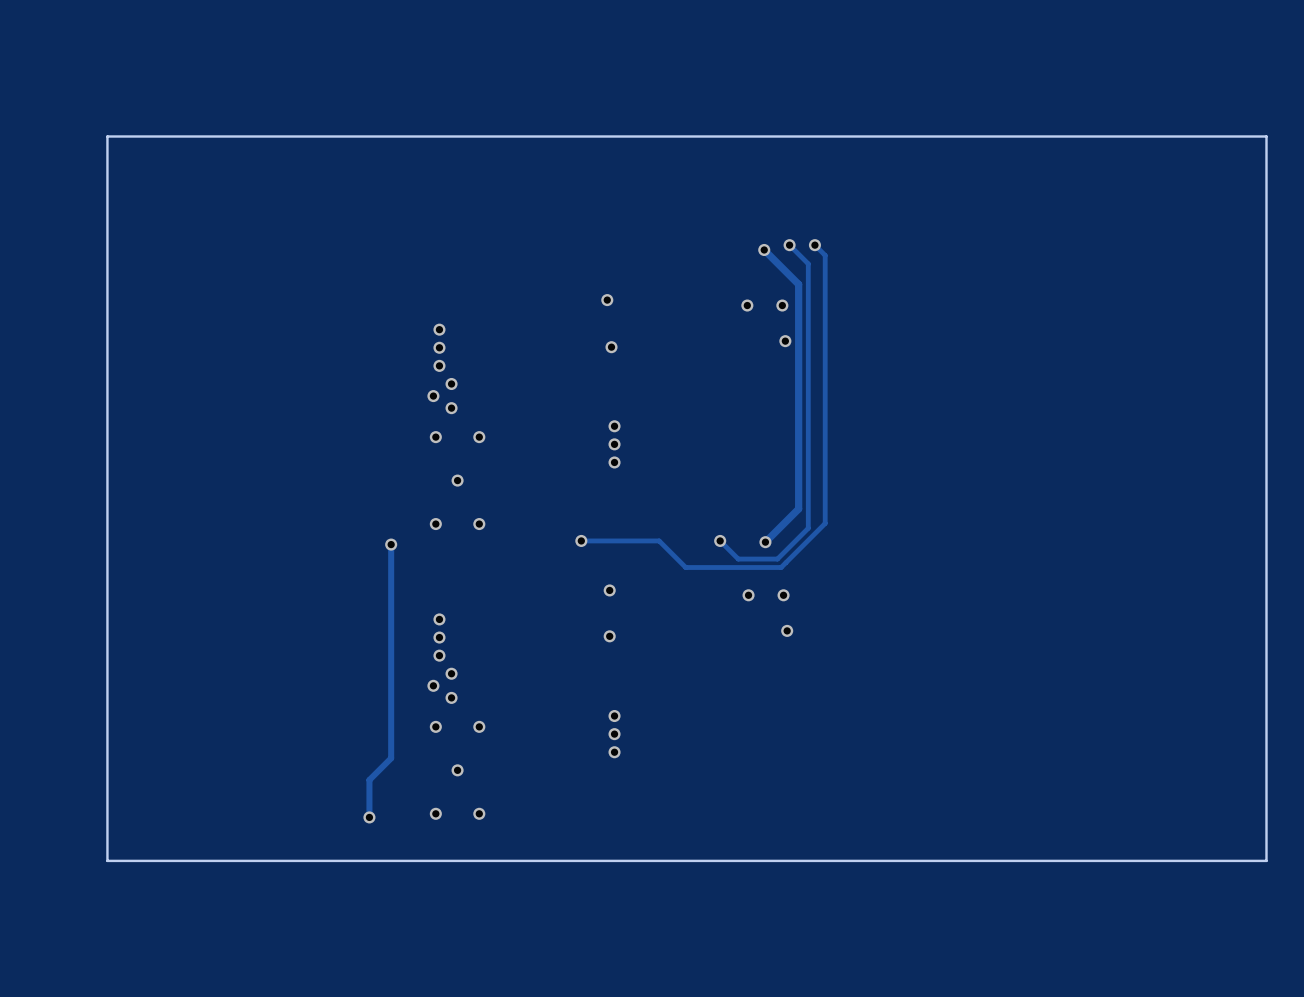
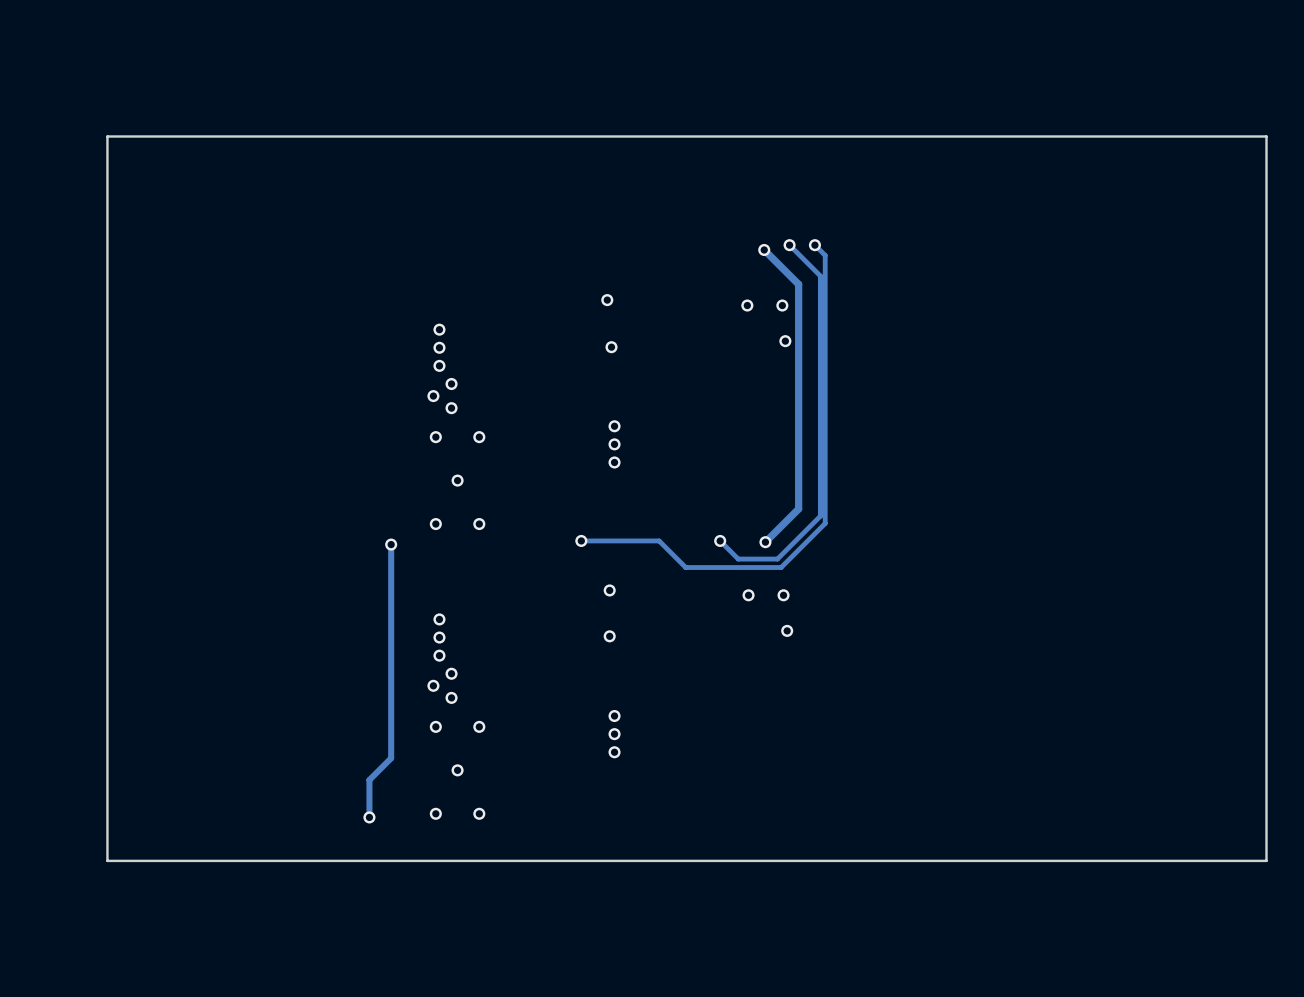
track: (808, 263) (808, 528) -> (808, 263) (820, 275) (820, 516) (808, 528)

